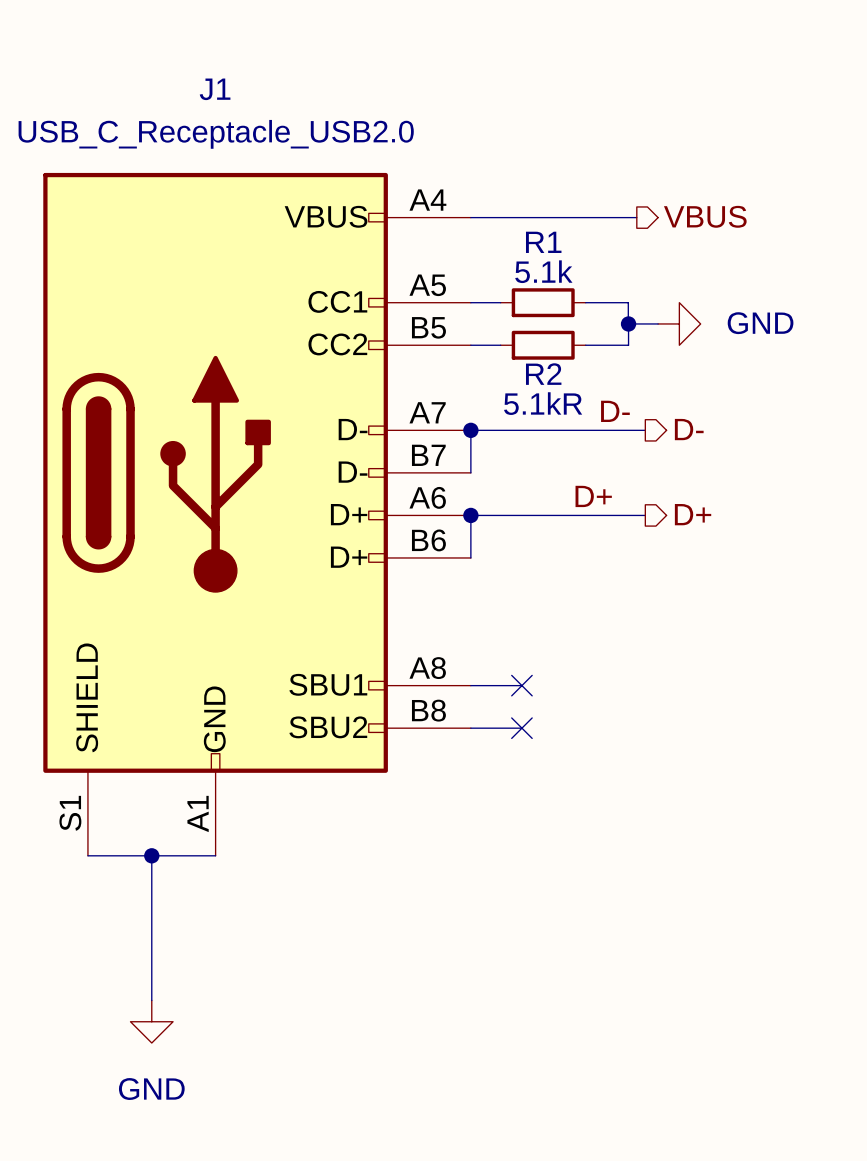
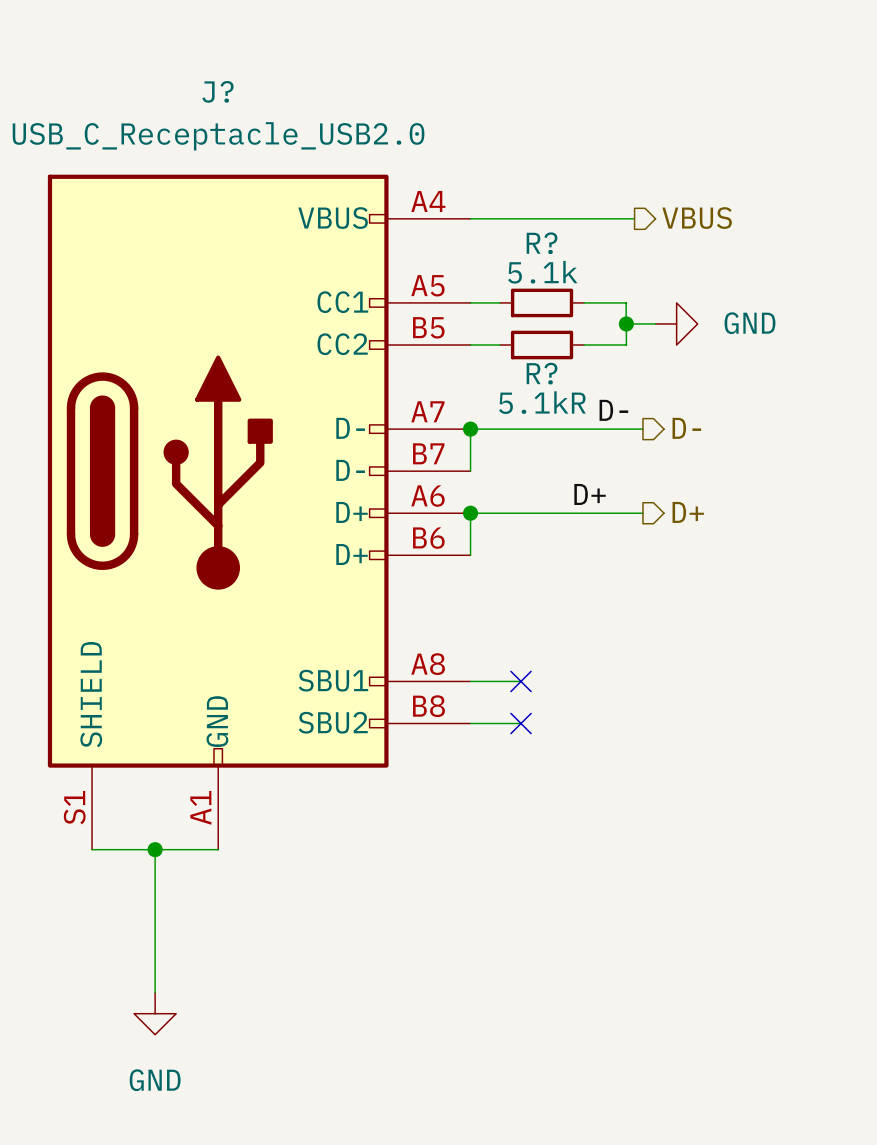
J1 name: J1 (215, 89) -> J? (217, 91)
R1 name: R1 (543, 242) -> R? (542, 243)
R2 name: R2 (543, 374) -> R? (542, 373)

